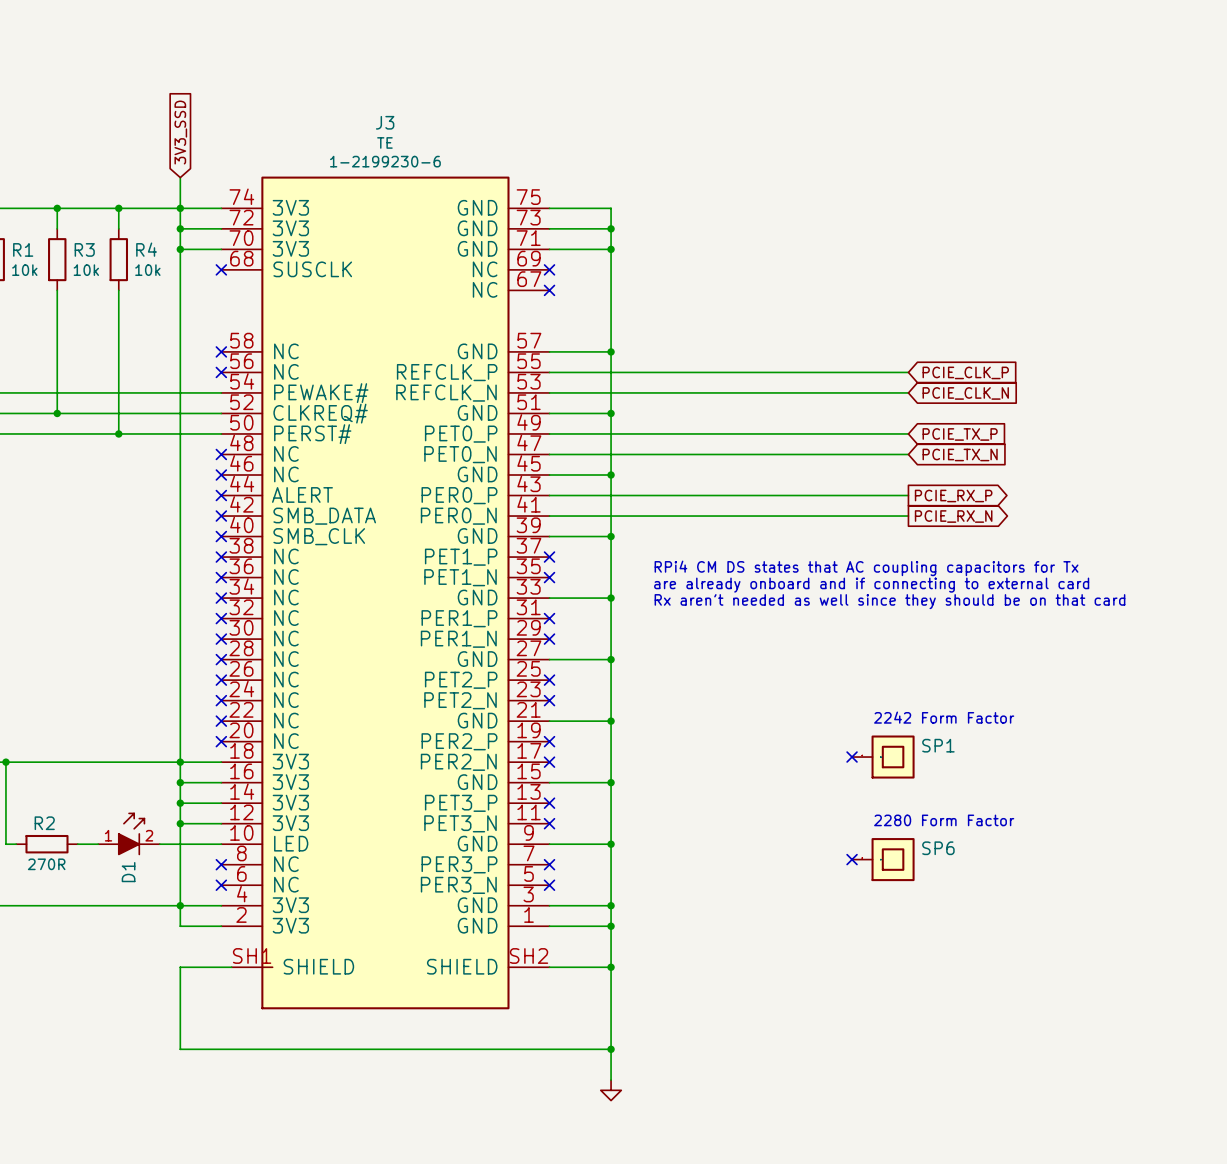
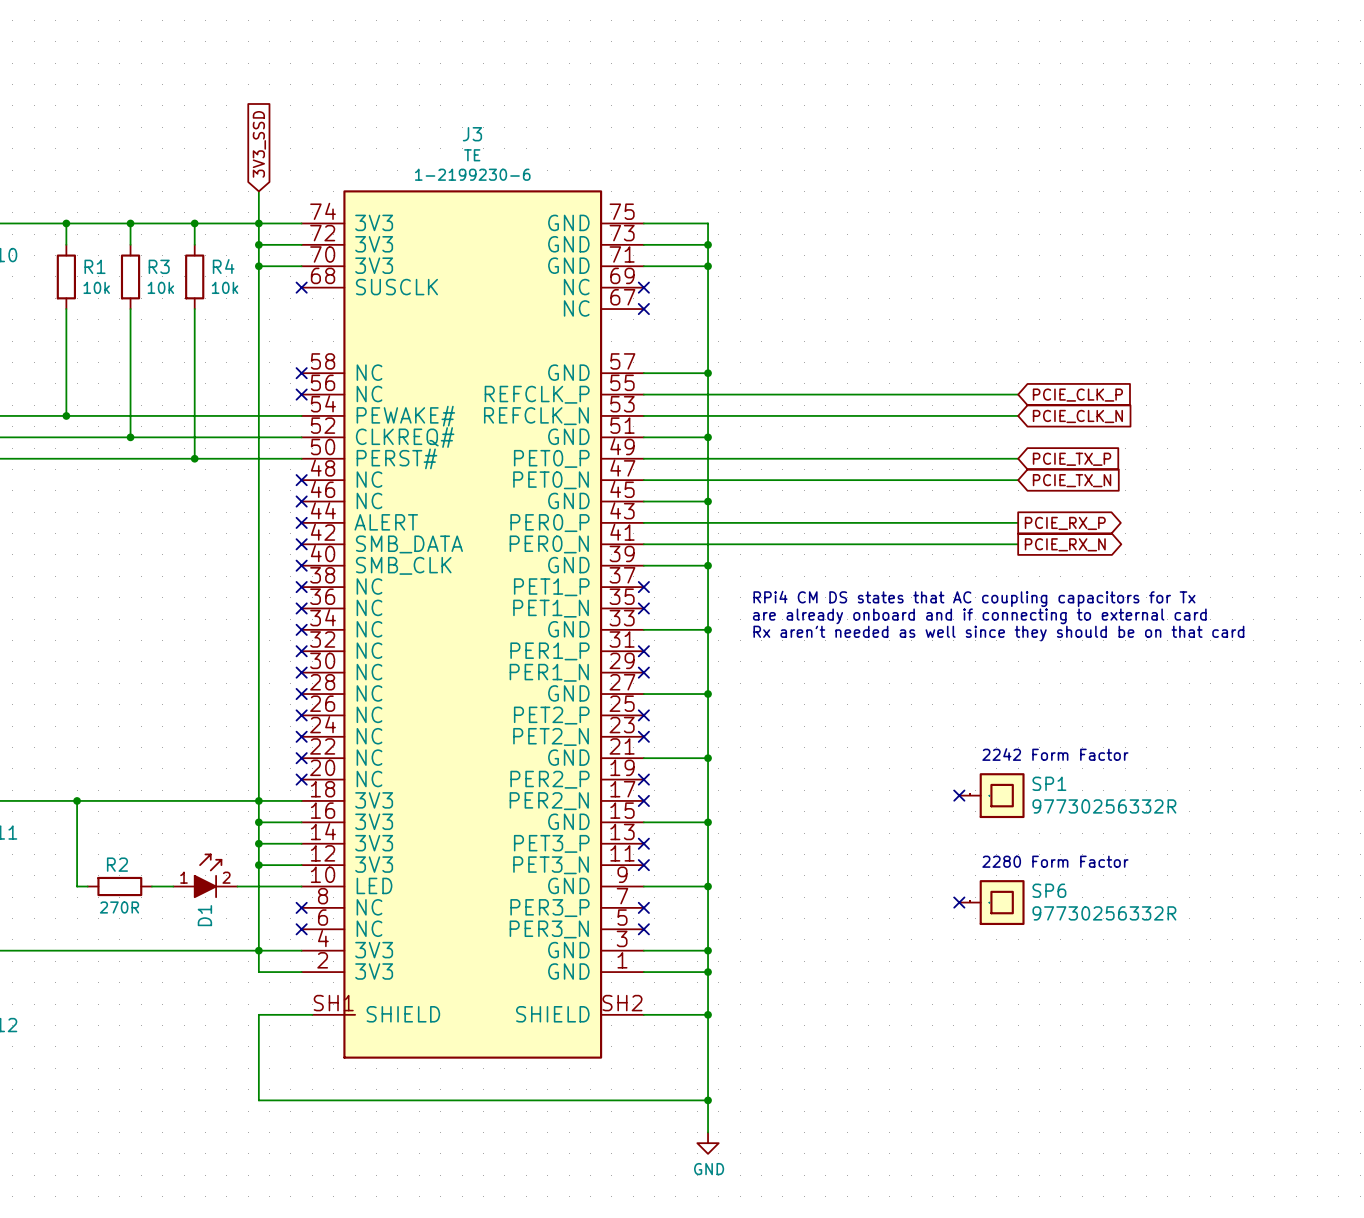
SP1 value: none -> 97730256332R (1104, 806)
SP6 value: none -> 97730256332R (1104, 913)
power symbol text: none -> GND (709, 1169)

